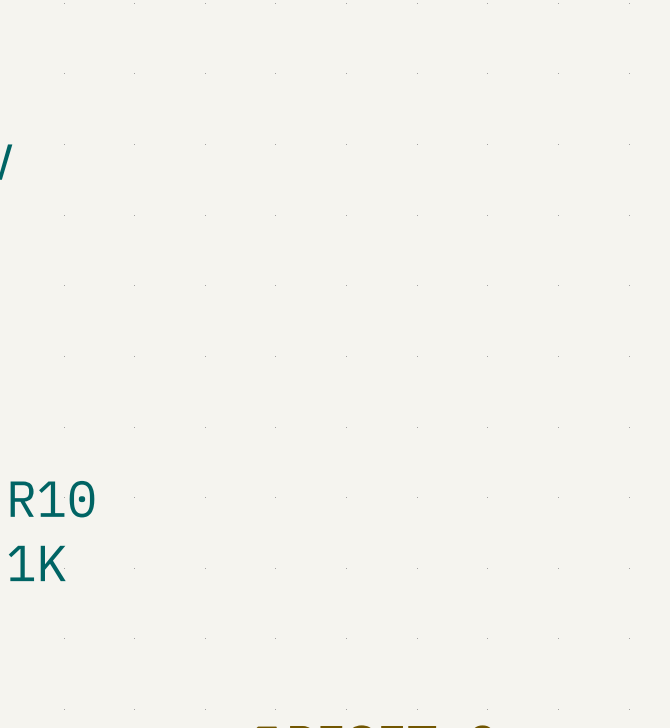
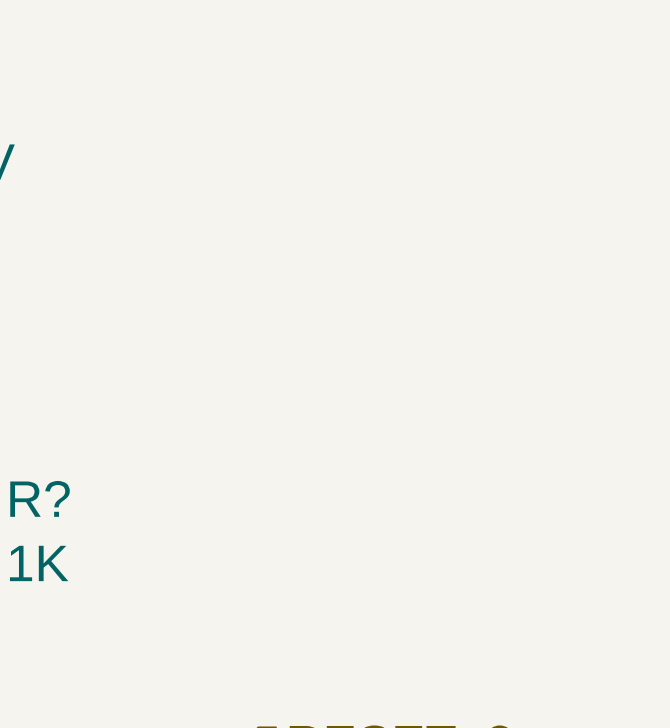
R10 name: R10 (52, 499) -> R? (40, 498)

